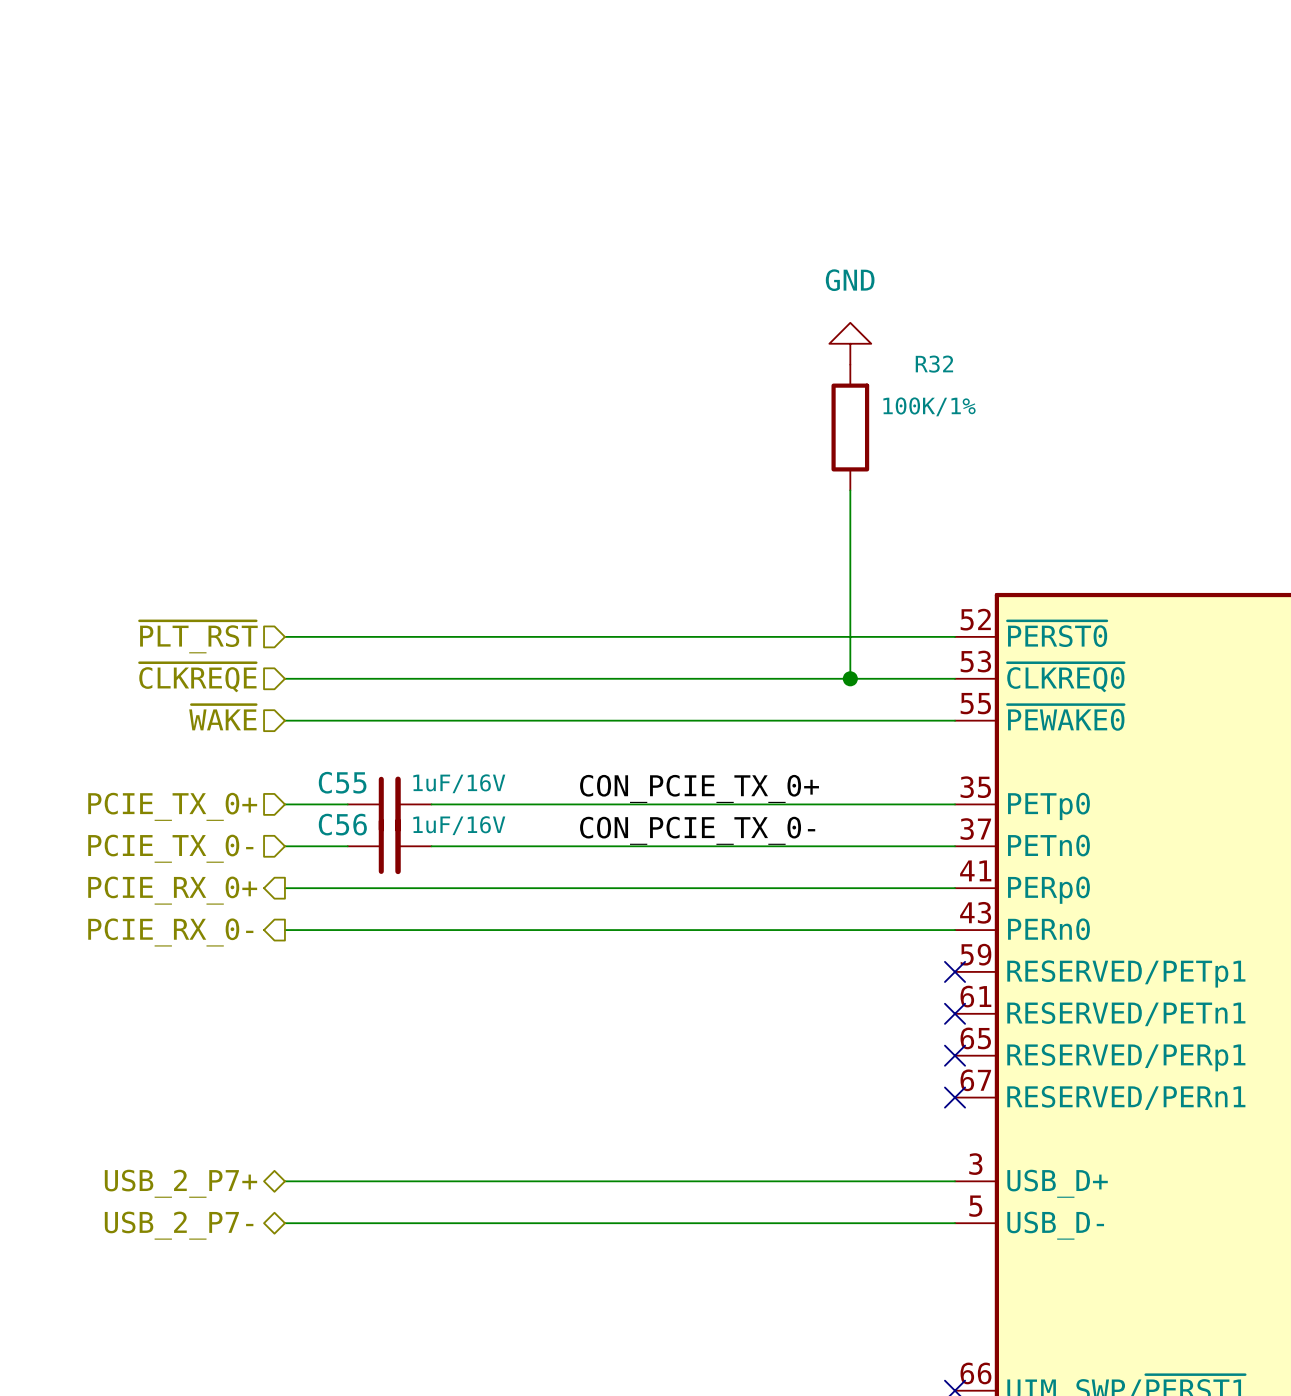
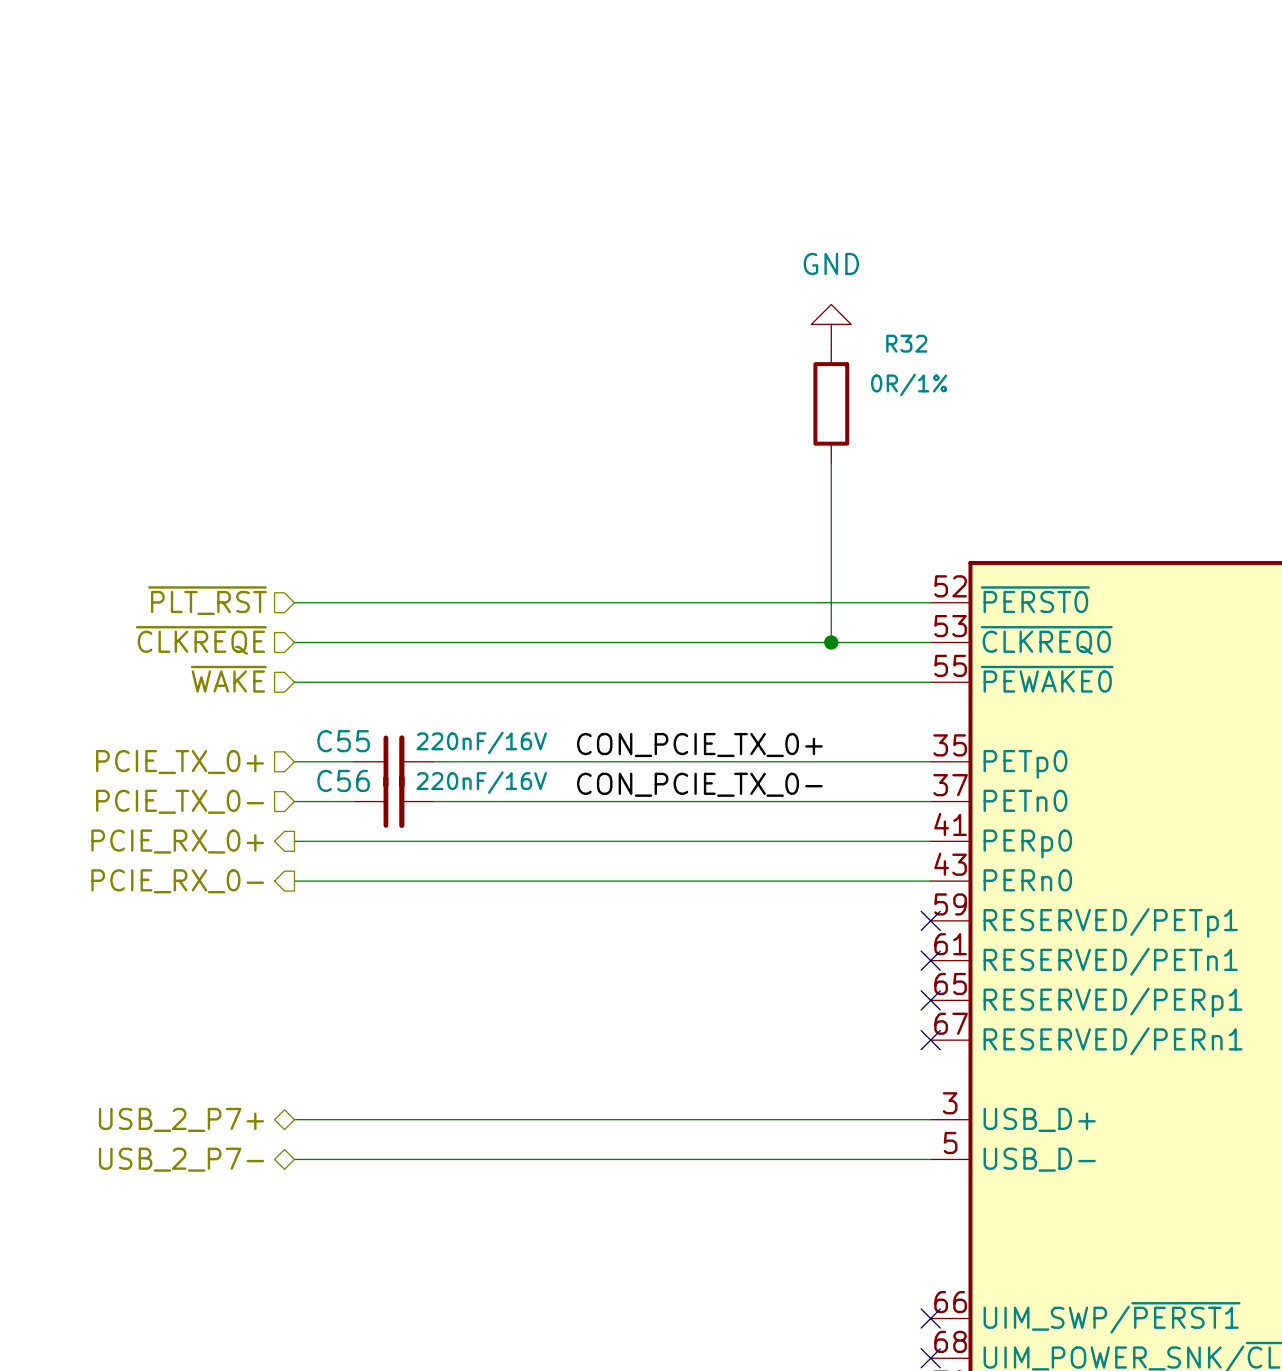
R32 value: 100K/1% (929, 406) -> 0R/1% (909, 384)
C55 value: 1uF/16V (459, 783) -> 220nF/16V (481, 742)
C56 value: 1uF/16V (459, 825) -> 220nF/16V (481, 782)

